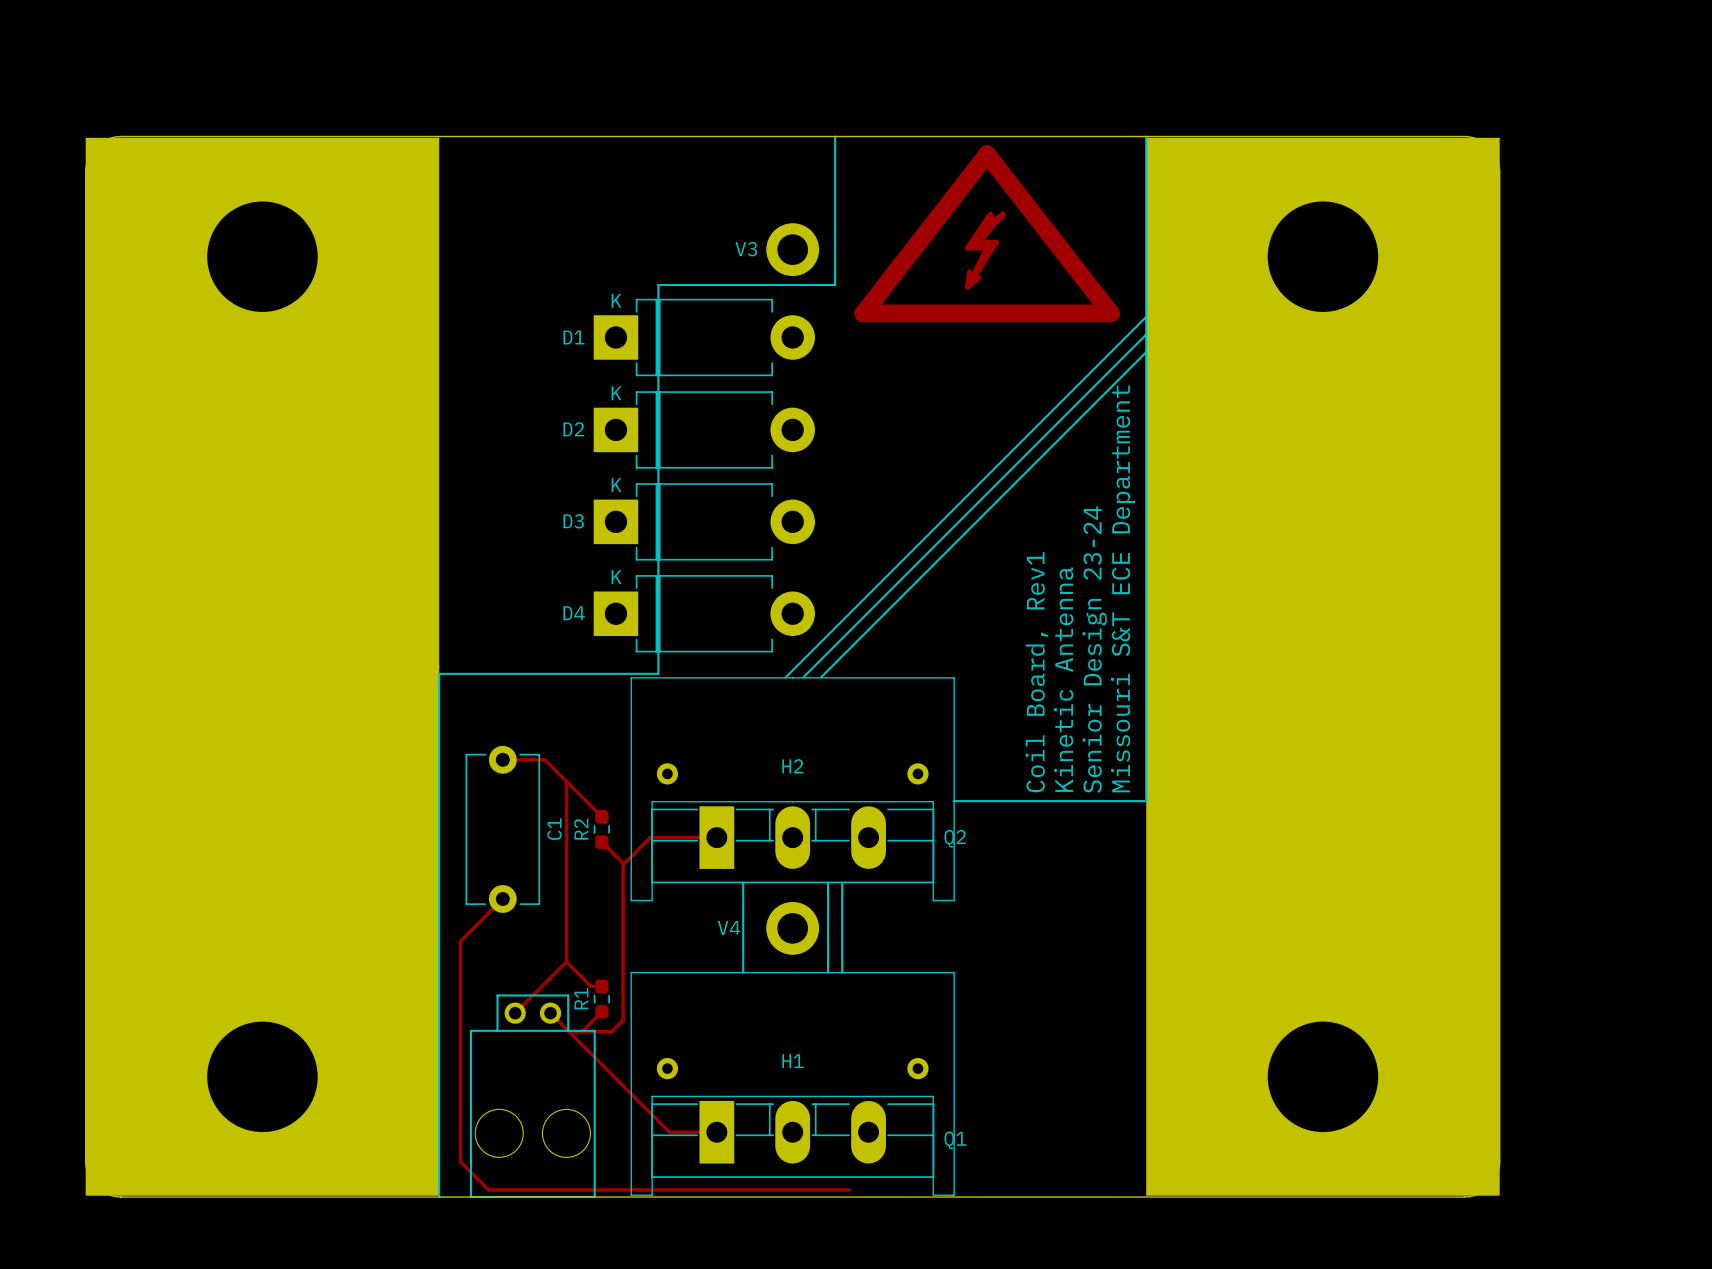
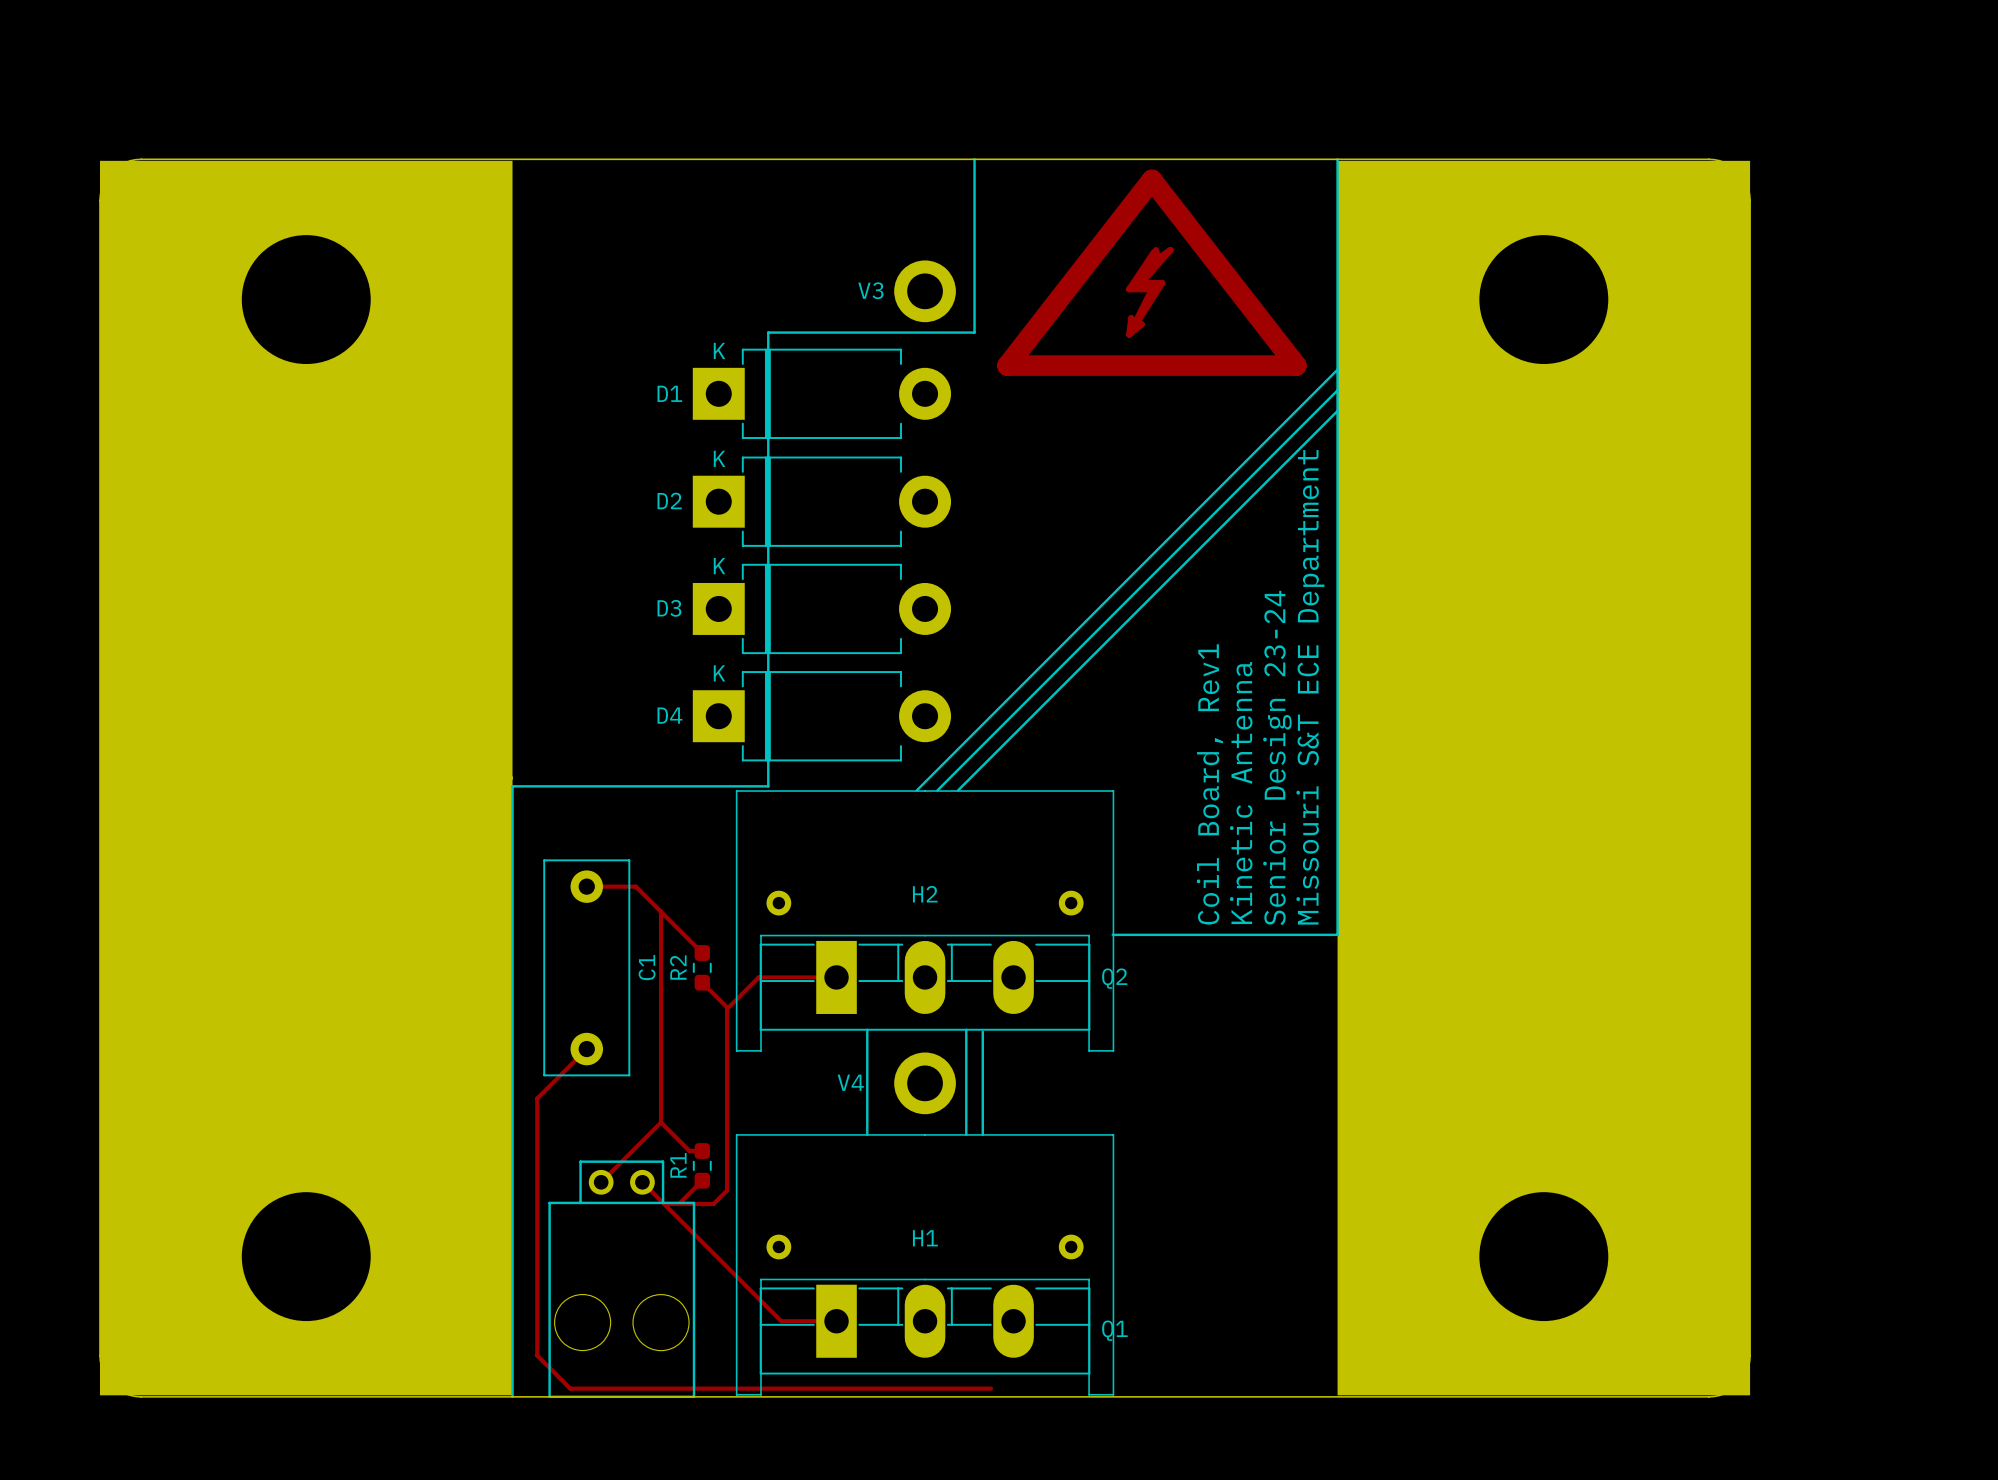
C1 footprint: [465, 745, 541, 913] -> [543, 859, 631, 1077]

